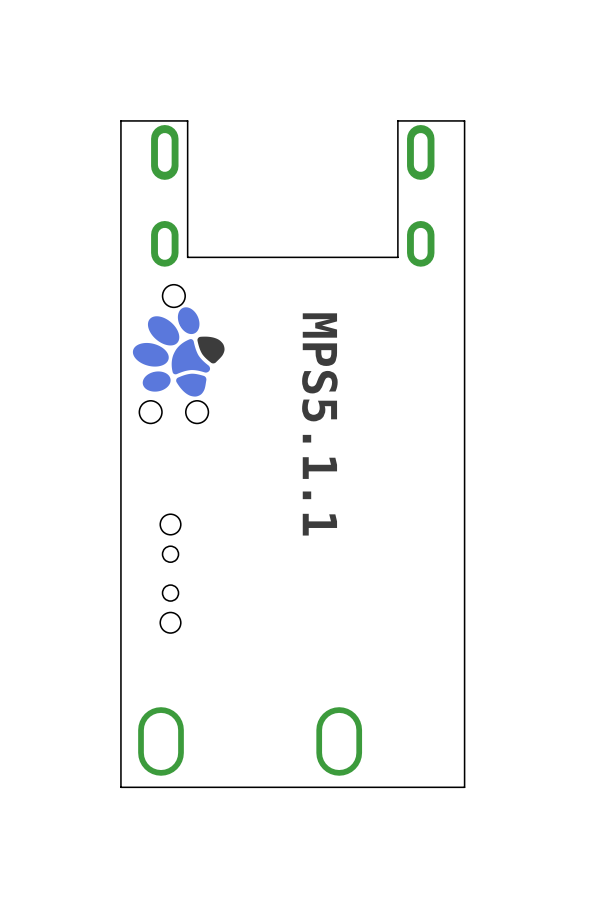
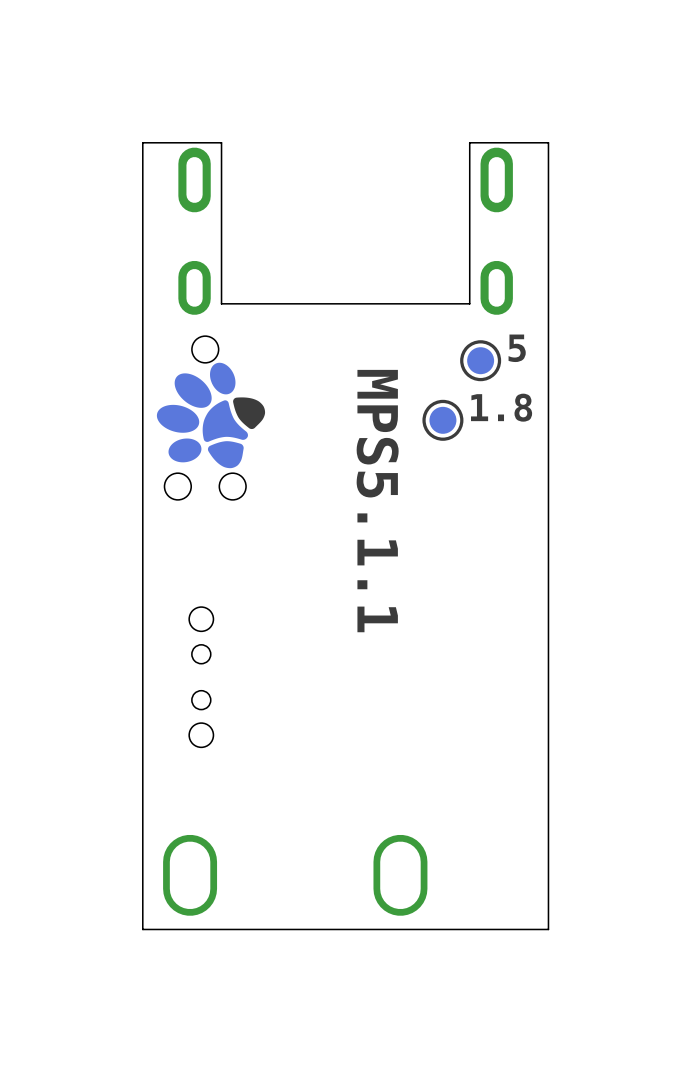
text: none -> 5 (517, 348)
part: none -> (480, 360)
text: none -> 1.8 (501, 407)
part: none -> (442, 420)

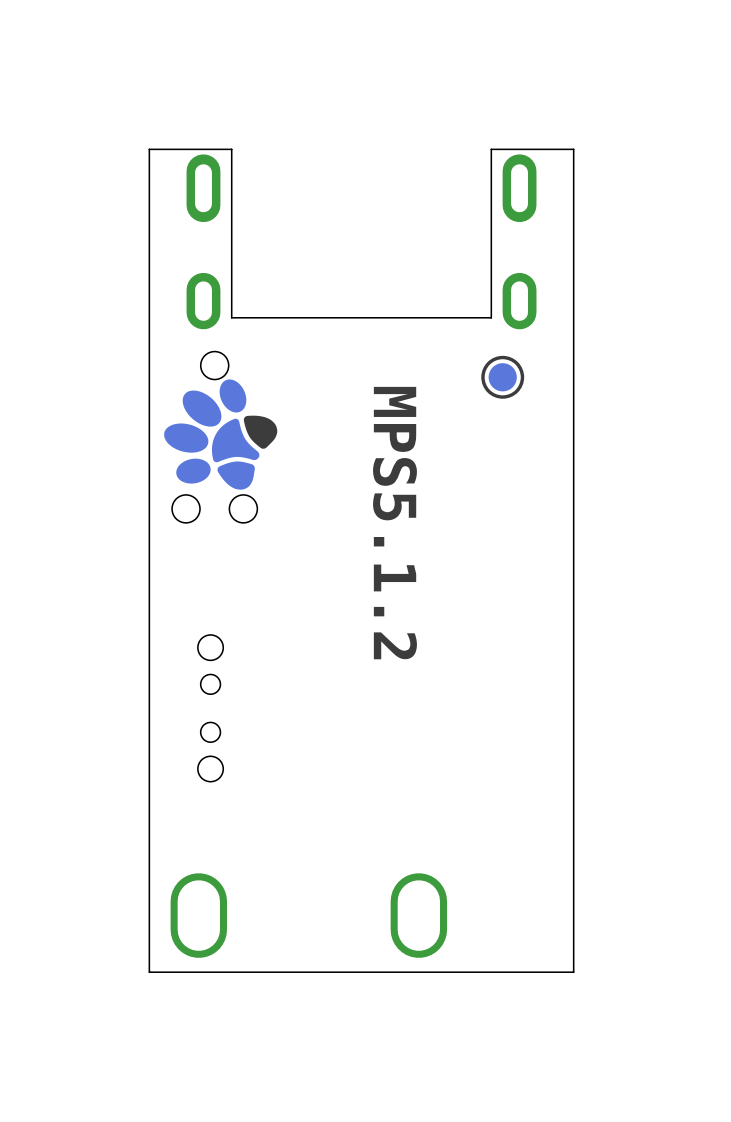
text: 5 (517, 348) -> none
text: 1.8 (501, 407) -> none
part: (442, 420) -> none
text: MPS5.1.1 (377, 501) -> MPS5.1.2 (394, 523)

